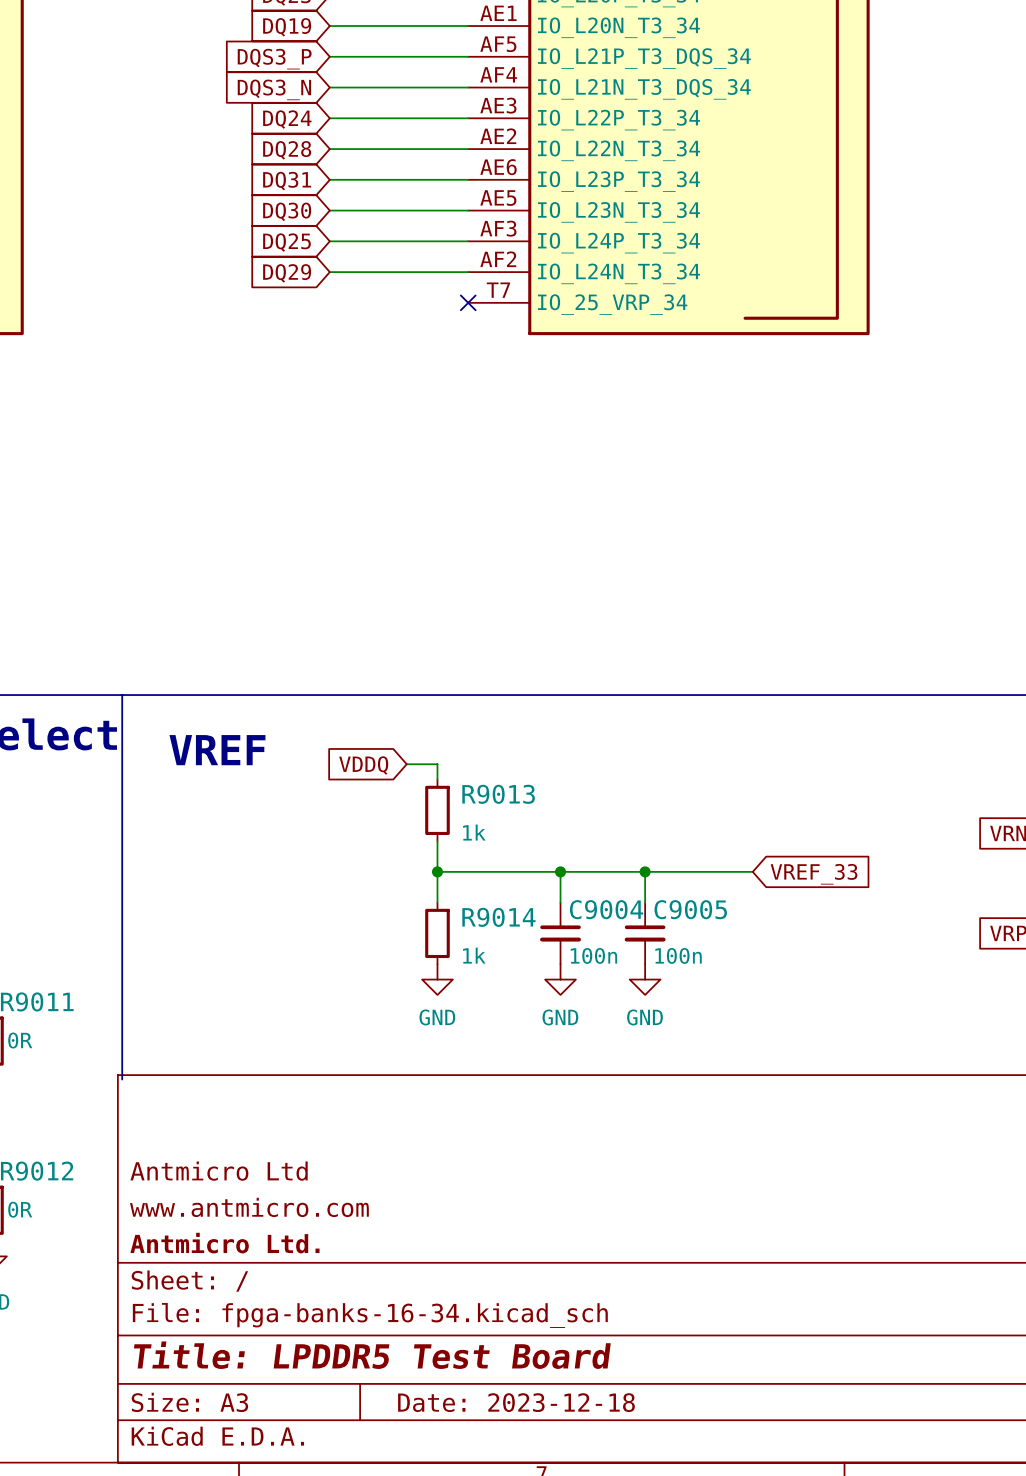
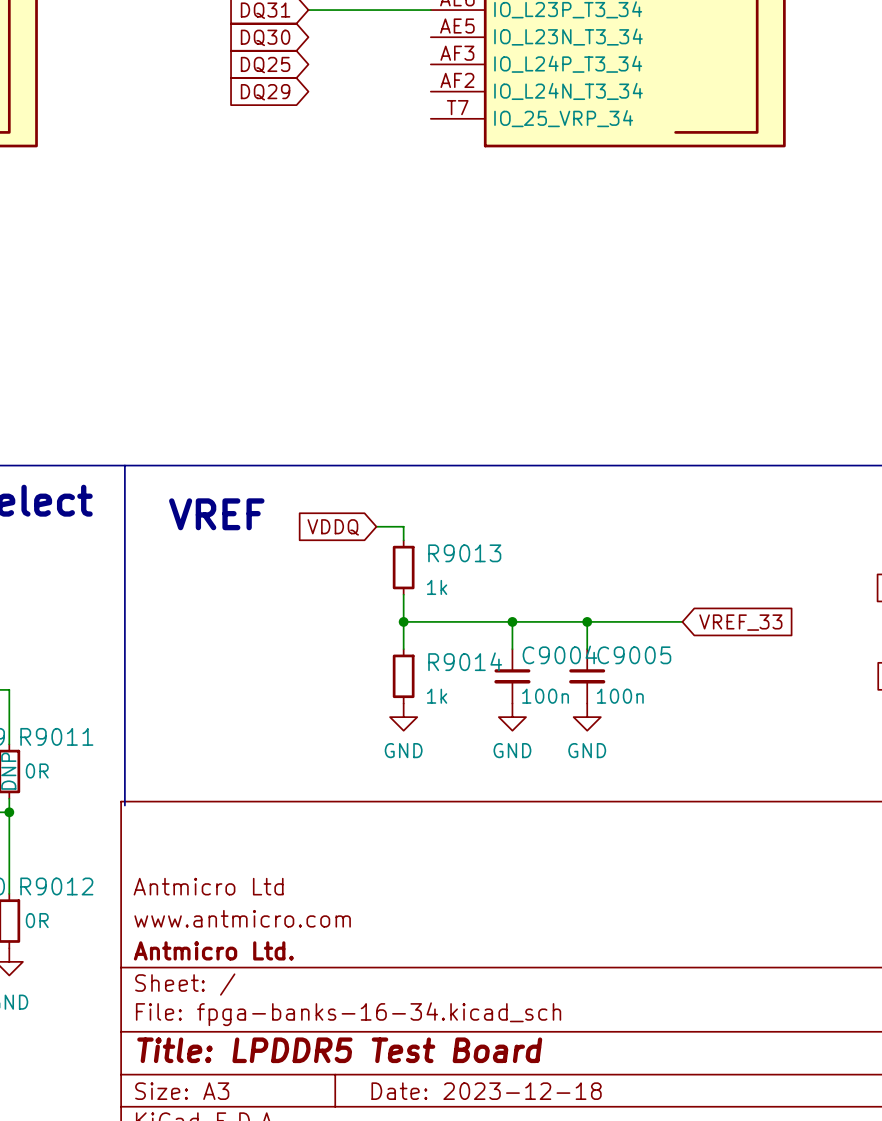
wire: (329, 210) (468, 210) -> none
wire: (329, 241) (468, 241) -> none
wire: (329, 272) (468, 272) -> none
no-connect mark: (468, 302) -> none

